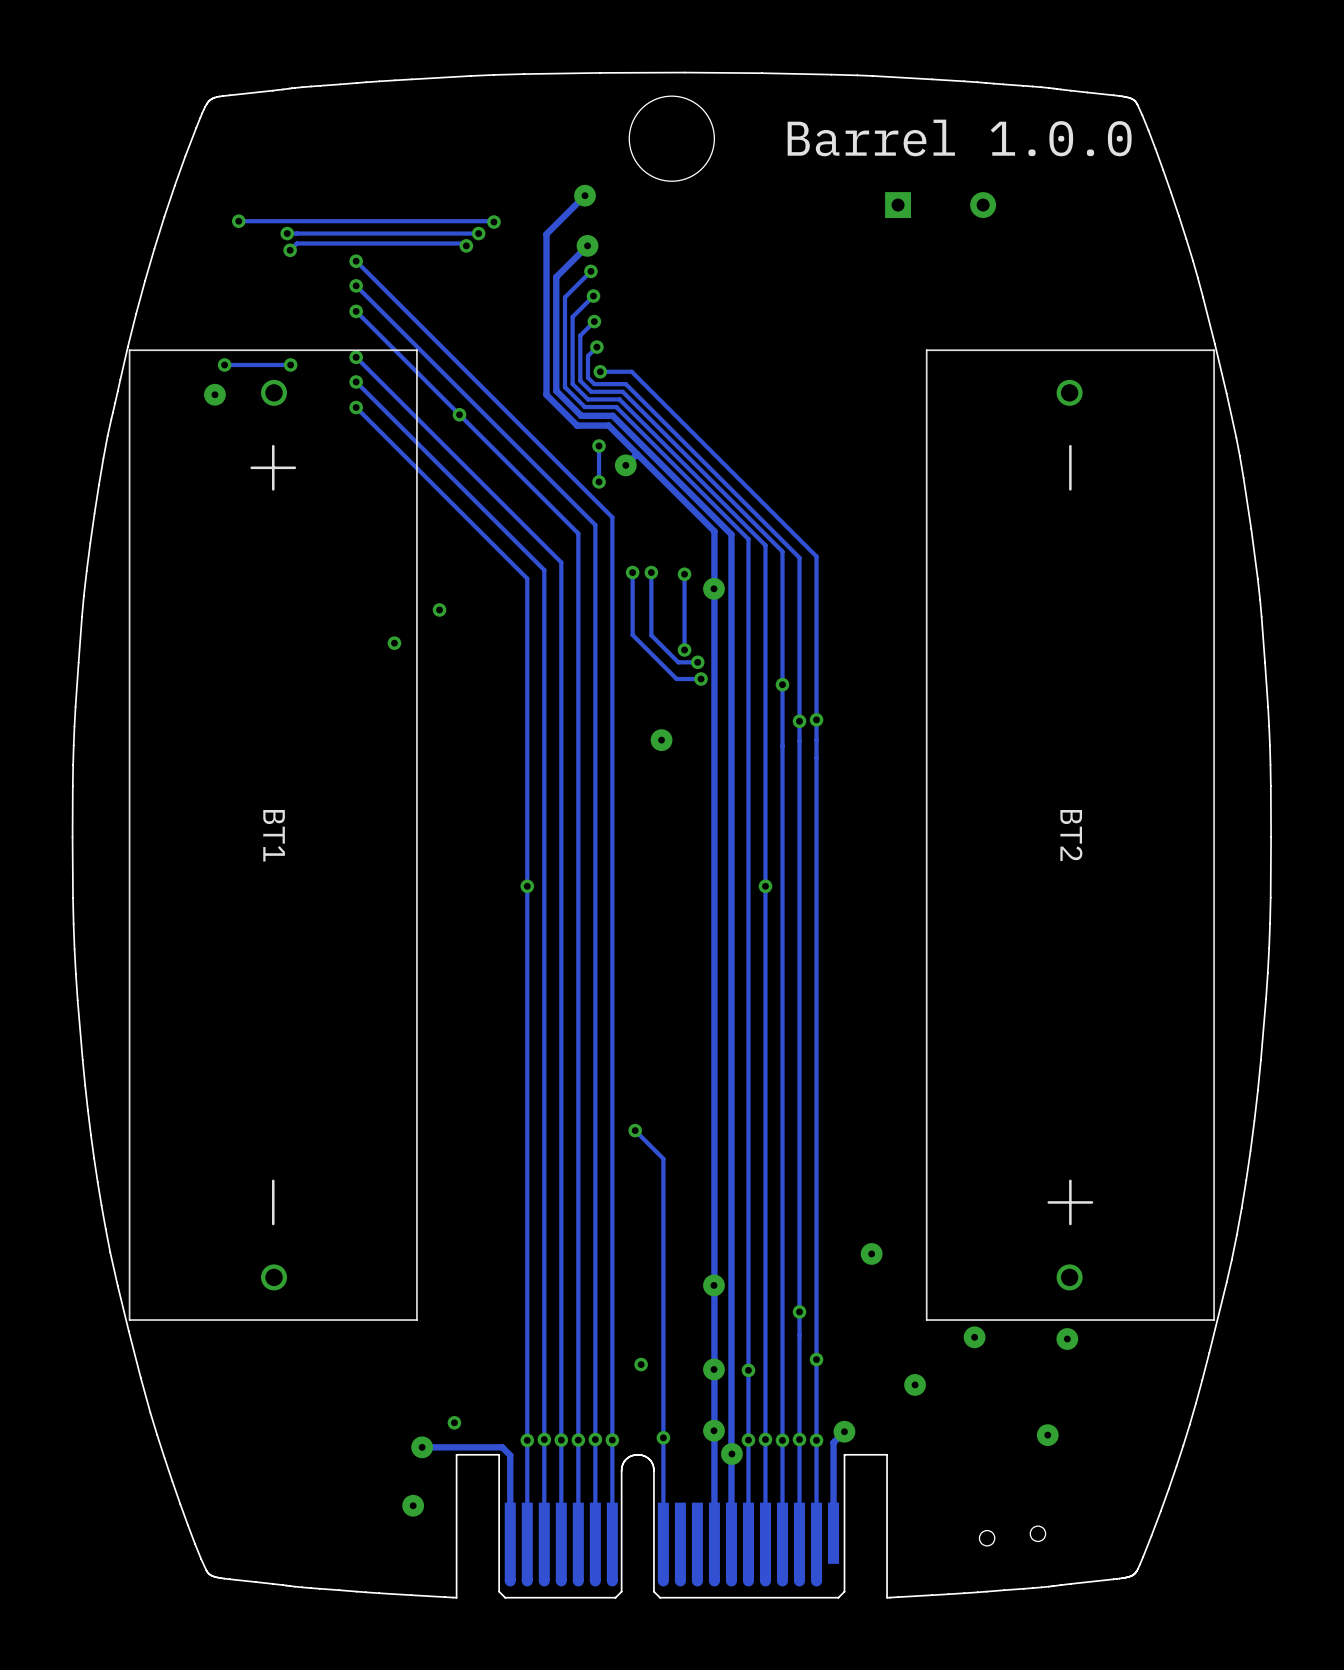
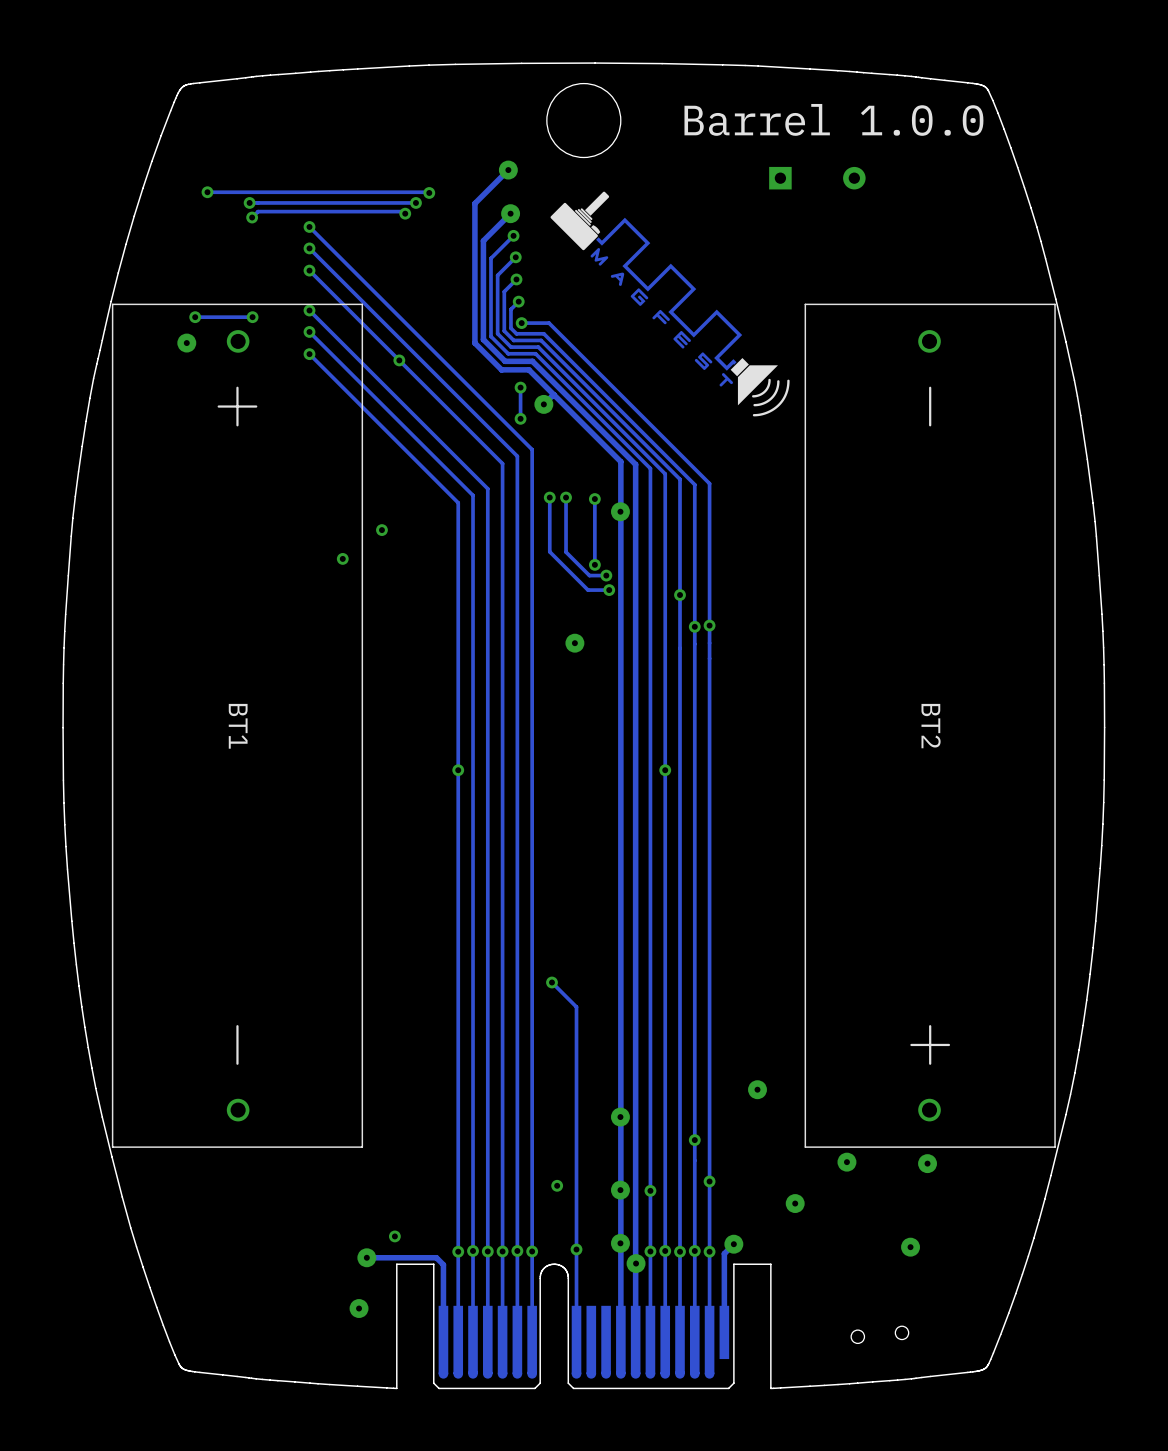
drawing: none -> [550, 191, 790, 417]

